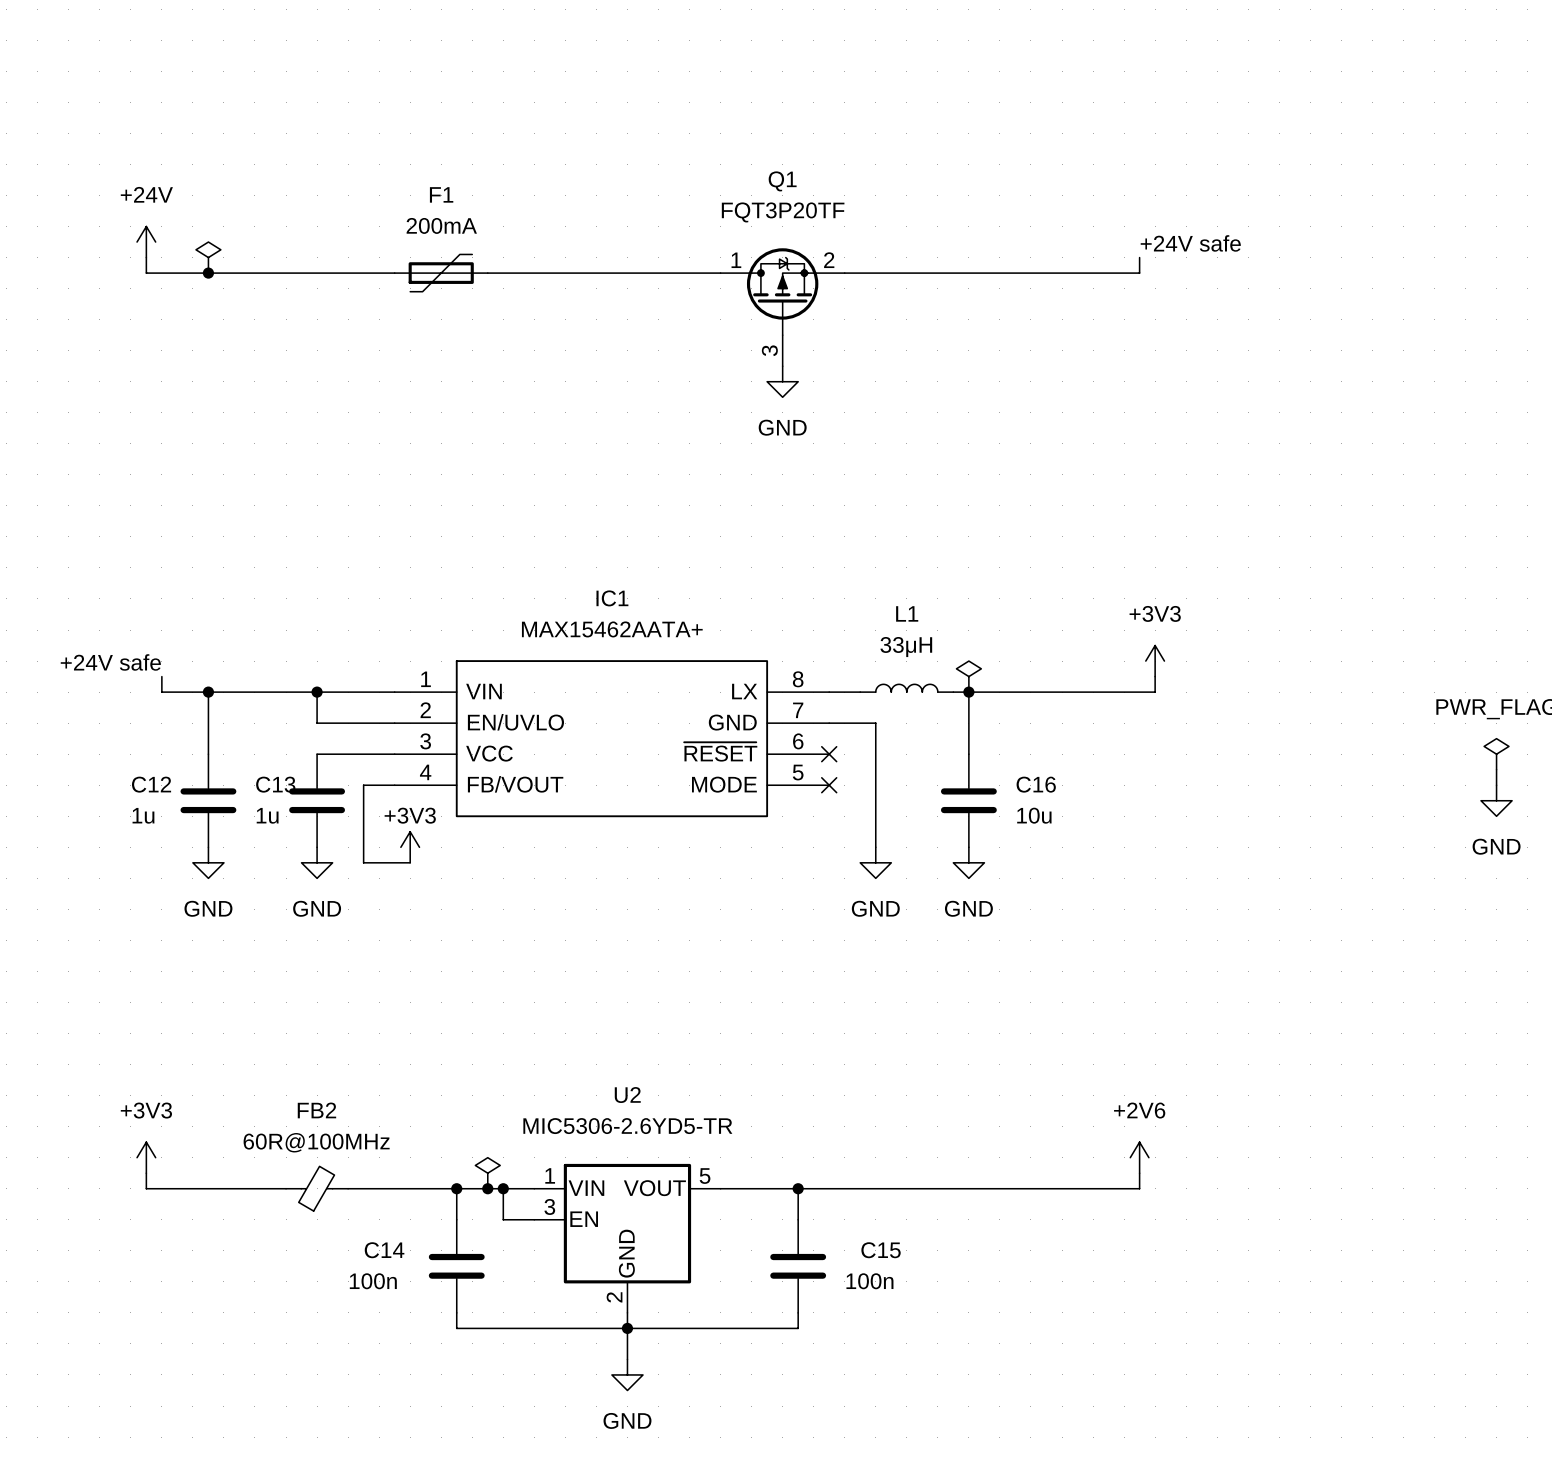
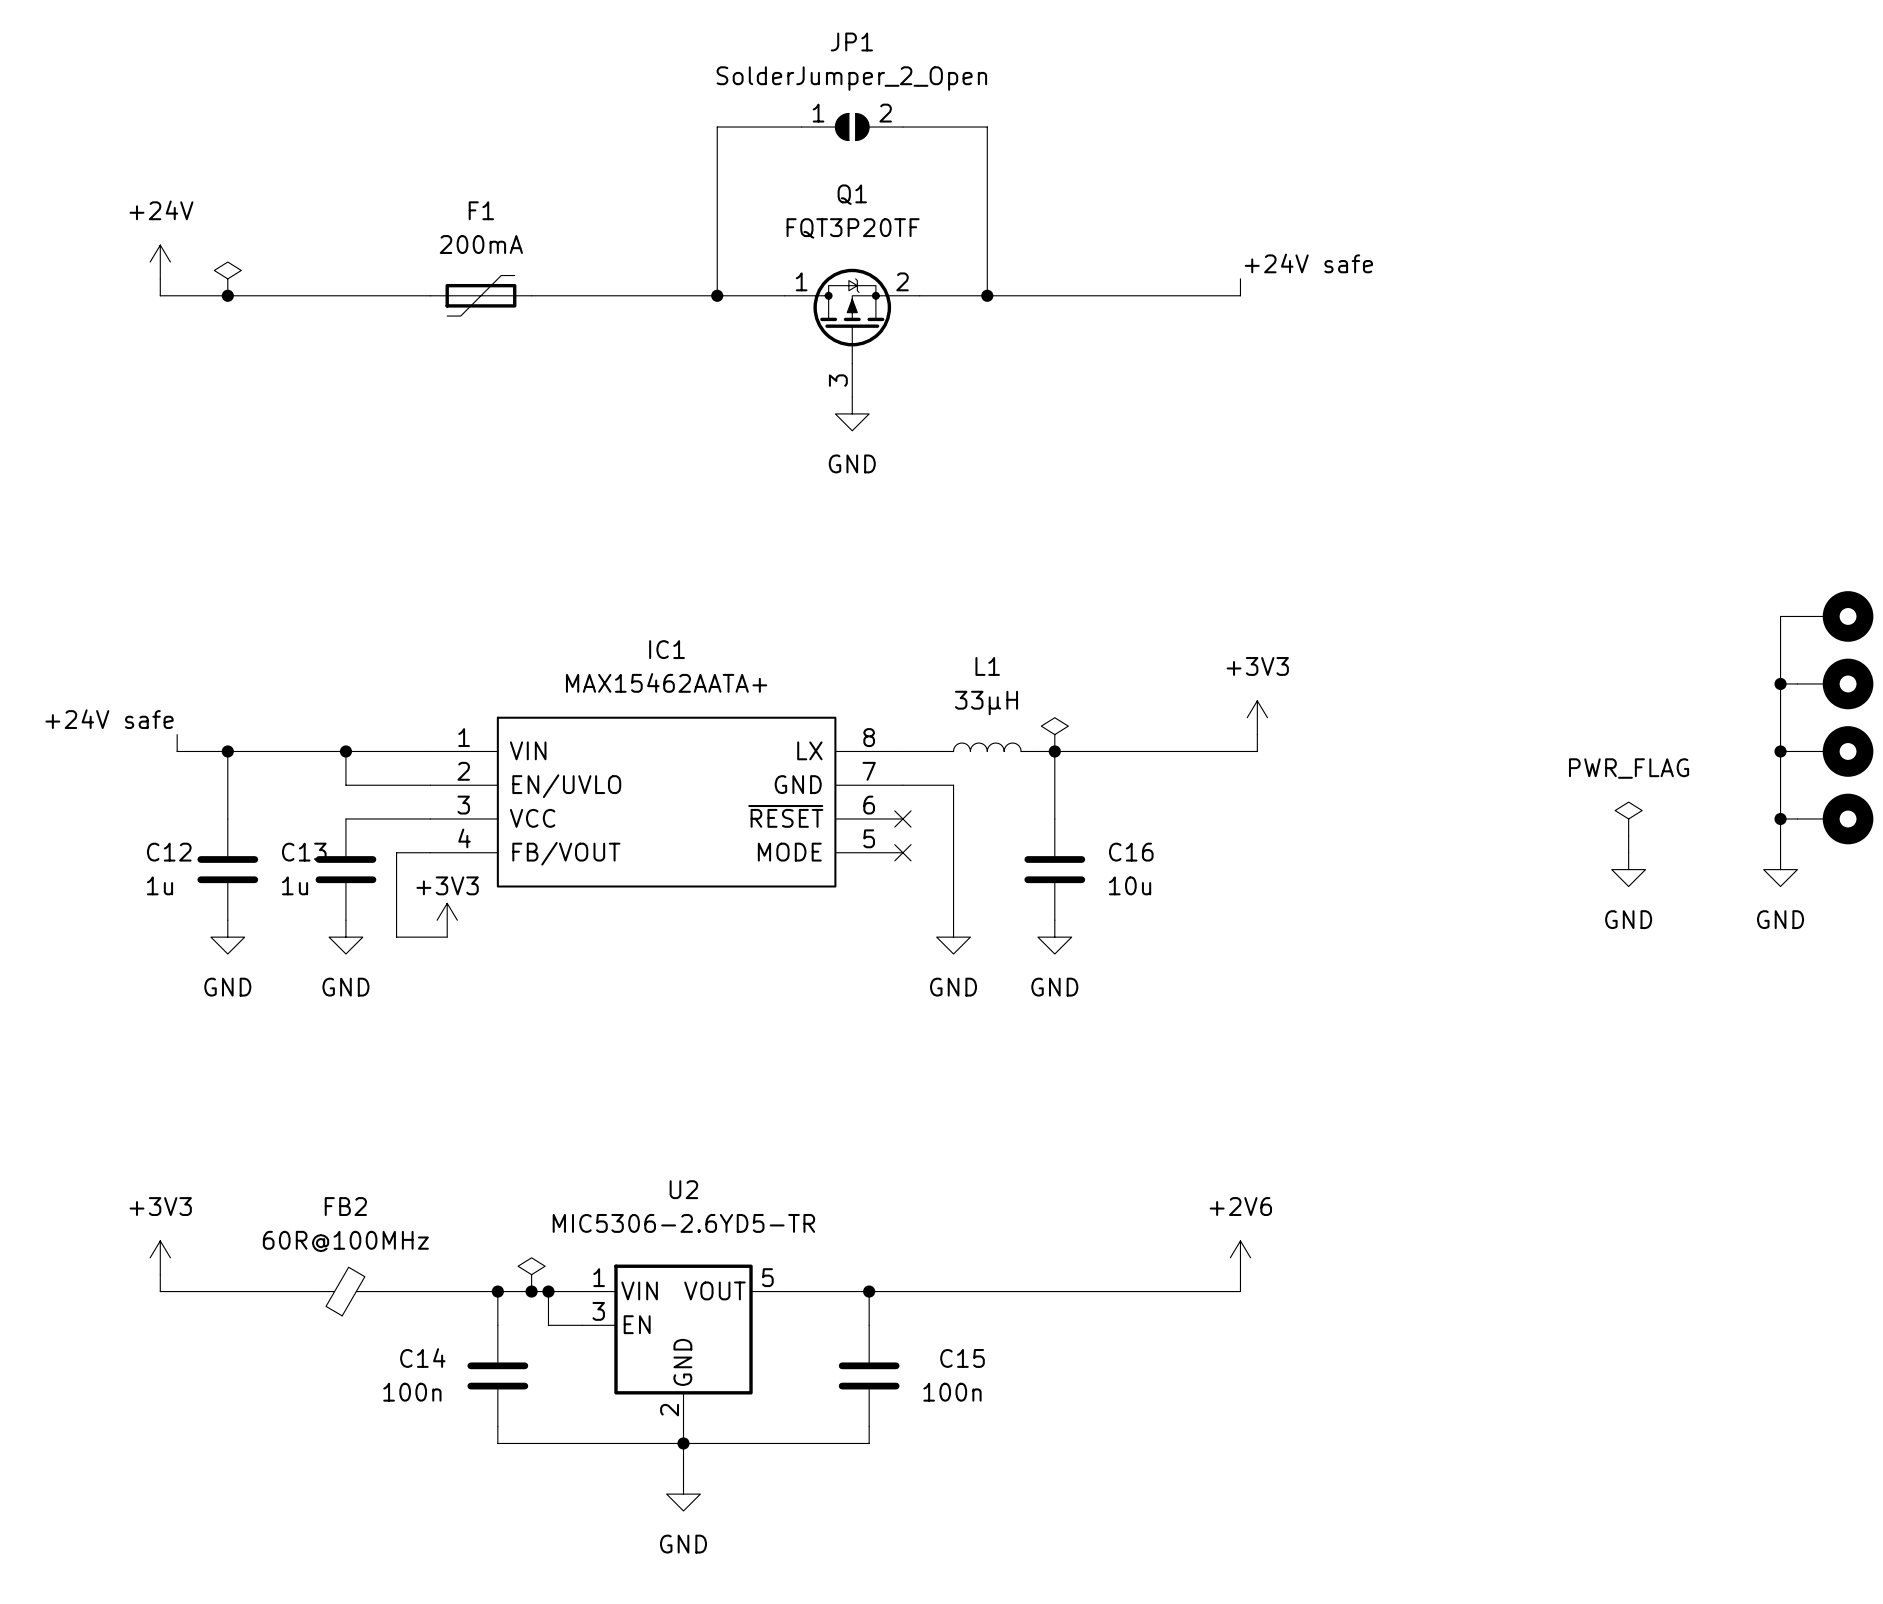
wire: none -> (801, 127) (717, 127) (717, 295)
JP1: none -> SolderJumper_2_Open (852, 127)
wire: none -> (902, 127) (987, 127) (987, 295)
junction: none -> (717, 295)
junction: none -> (987, 295)

